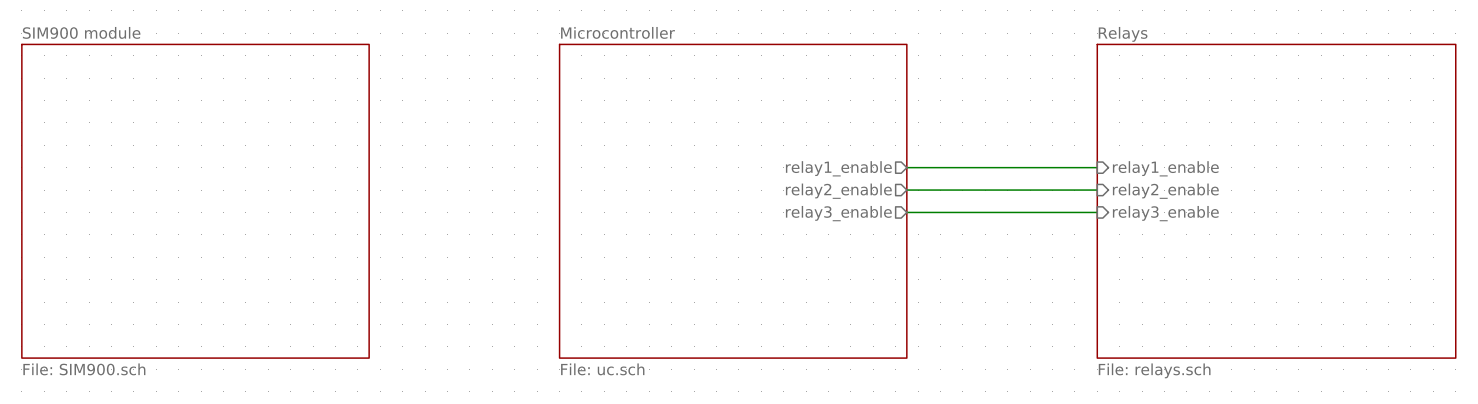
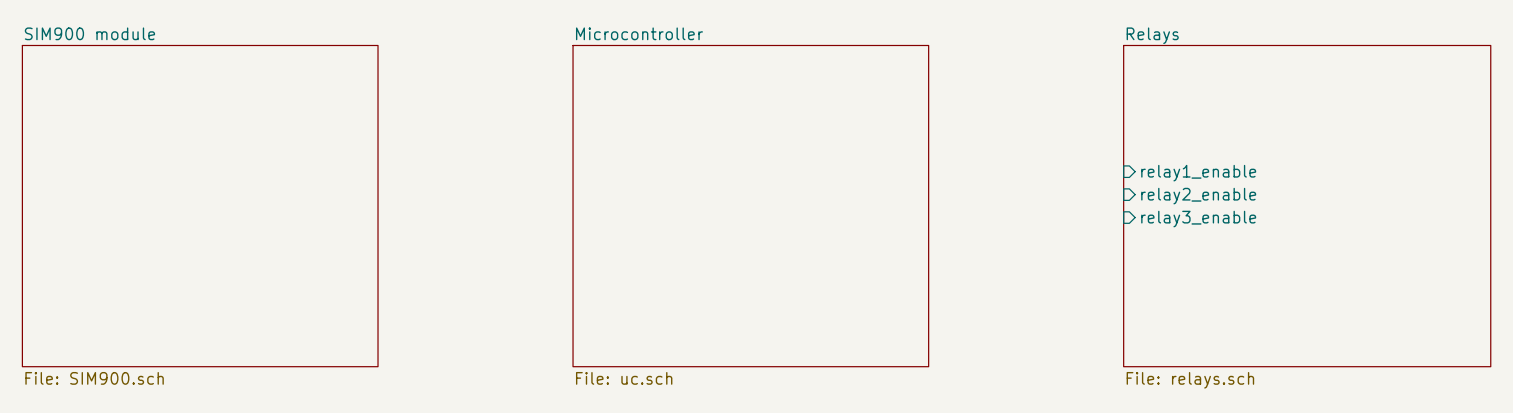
wire: (906, 167) (1097, 167) -> none
sheet pin: relay1_enable (838, 168) -> none
wire: (906, 190) (1097, 190) -> none
sheet pin: relay2_enable (838, 191) -> none
wire: (906, 212) (1097, 212) -> none
sheet pin: relay3_enable (838, 213) -> none

